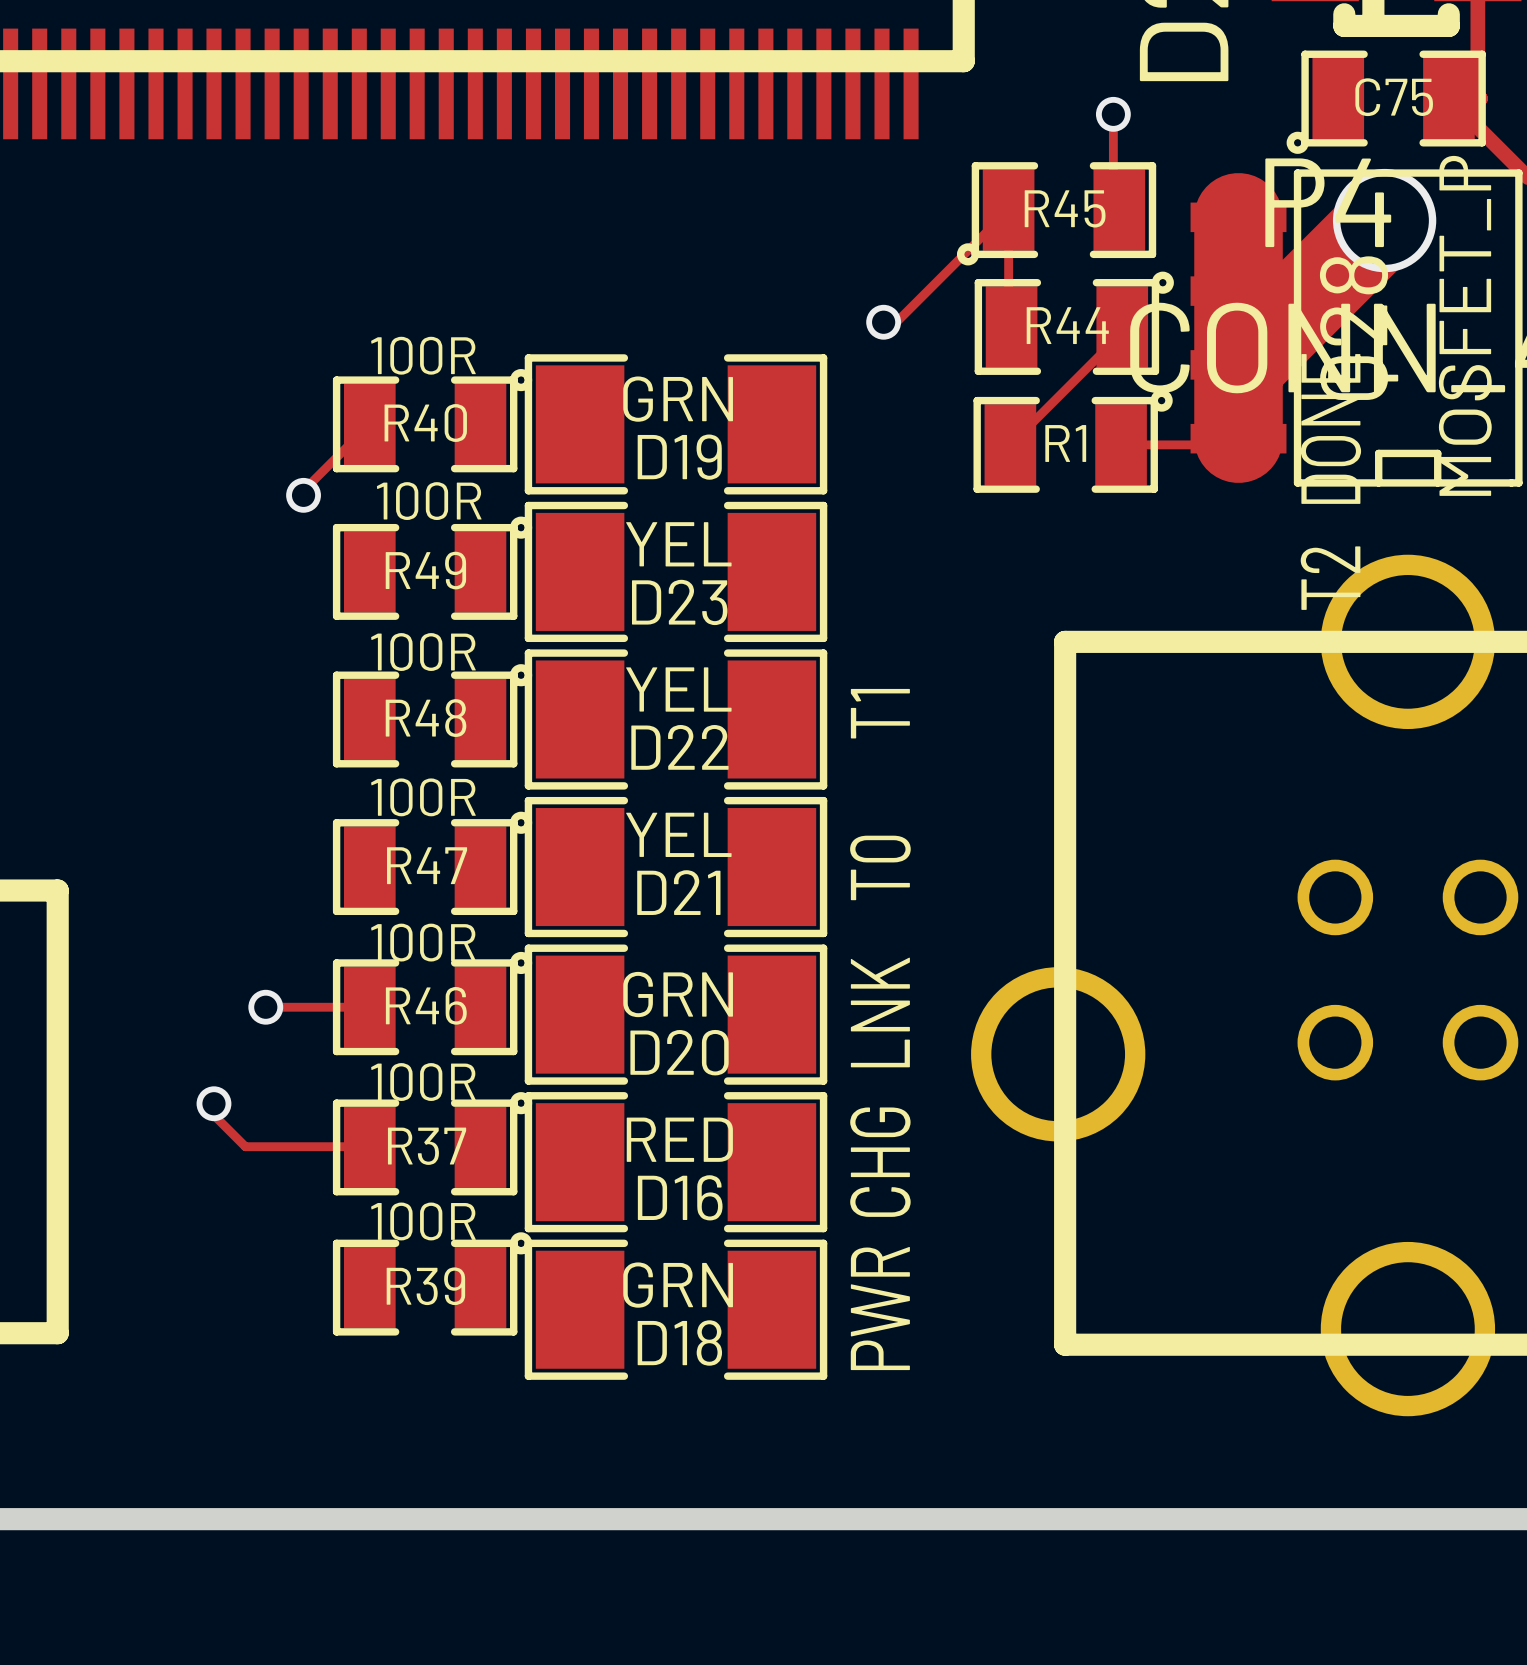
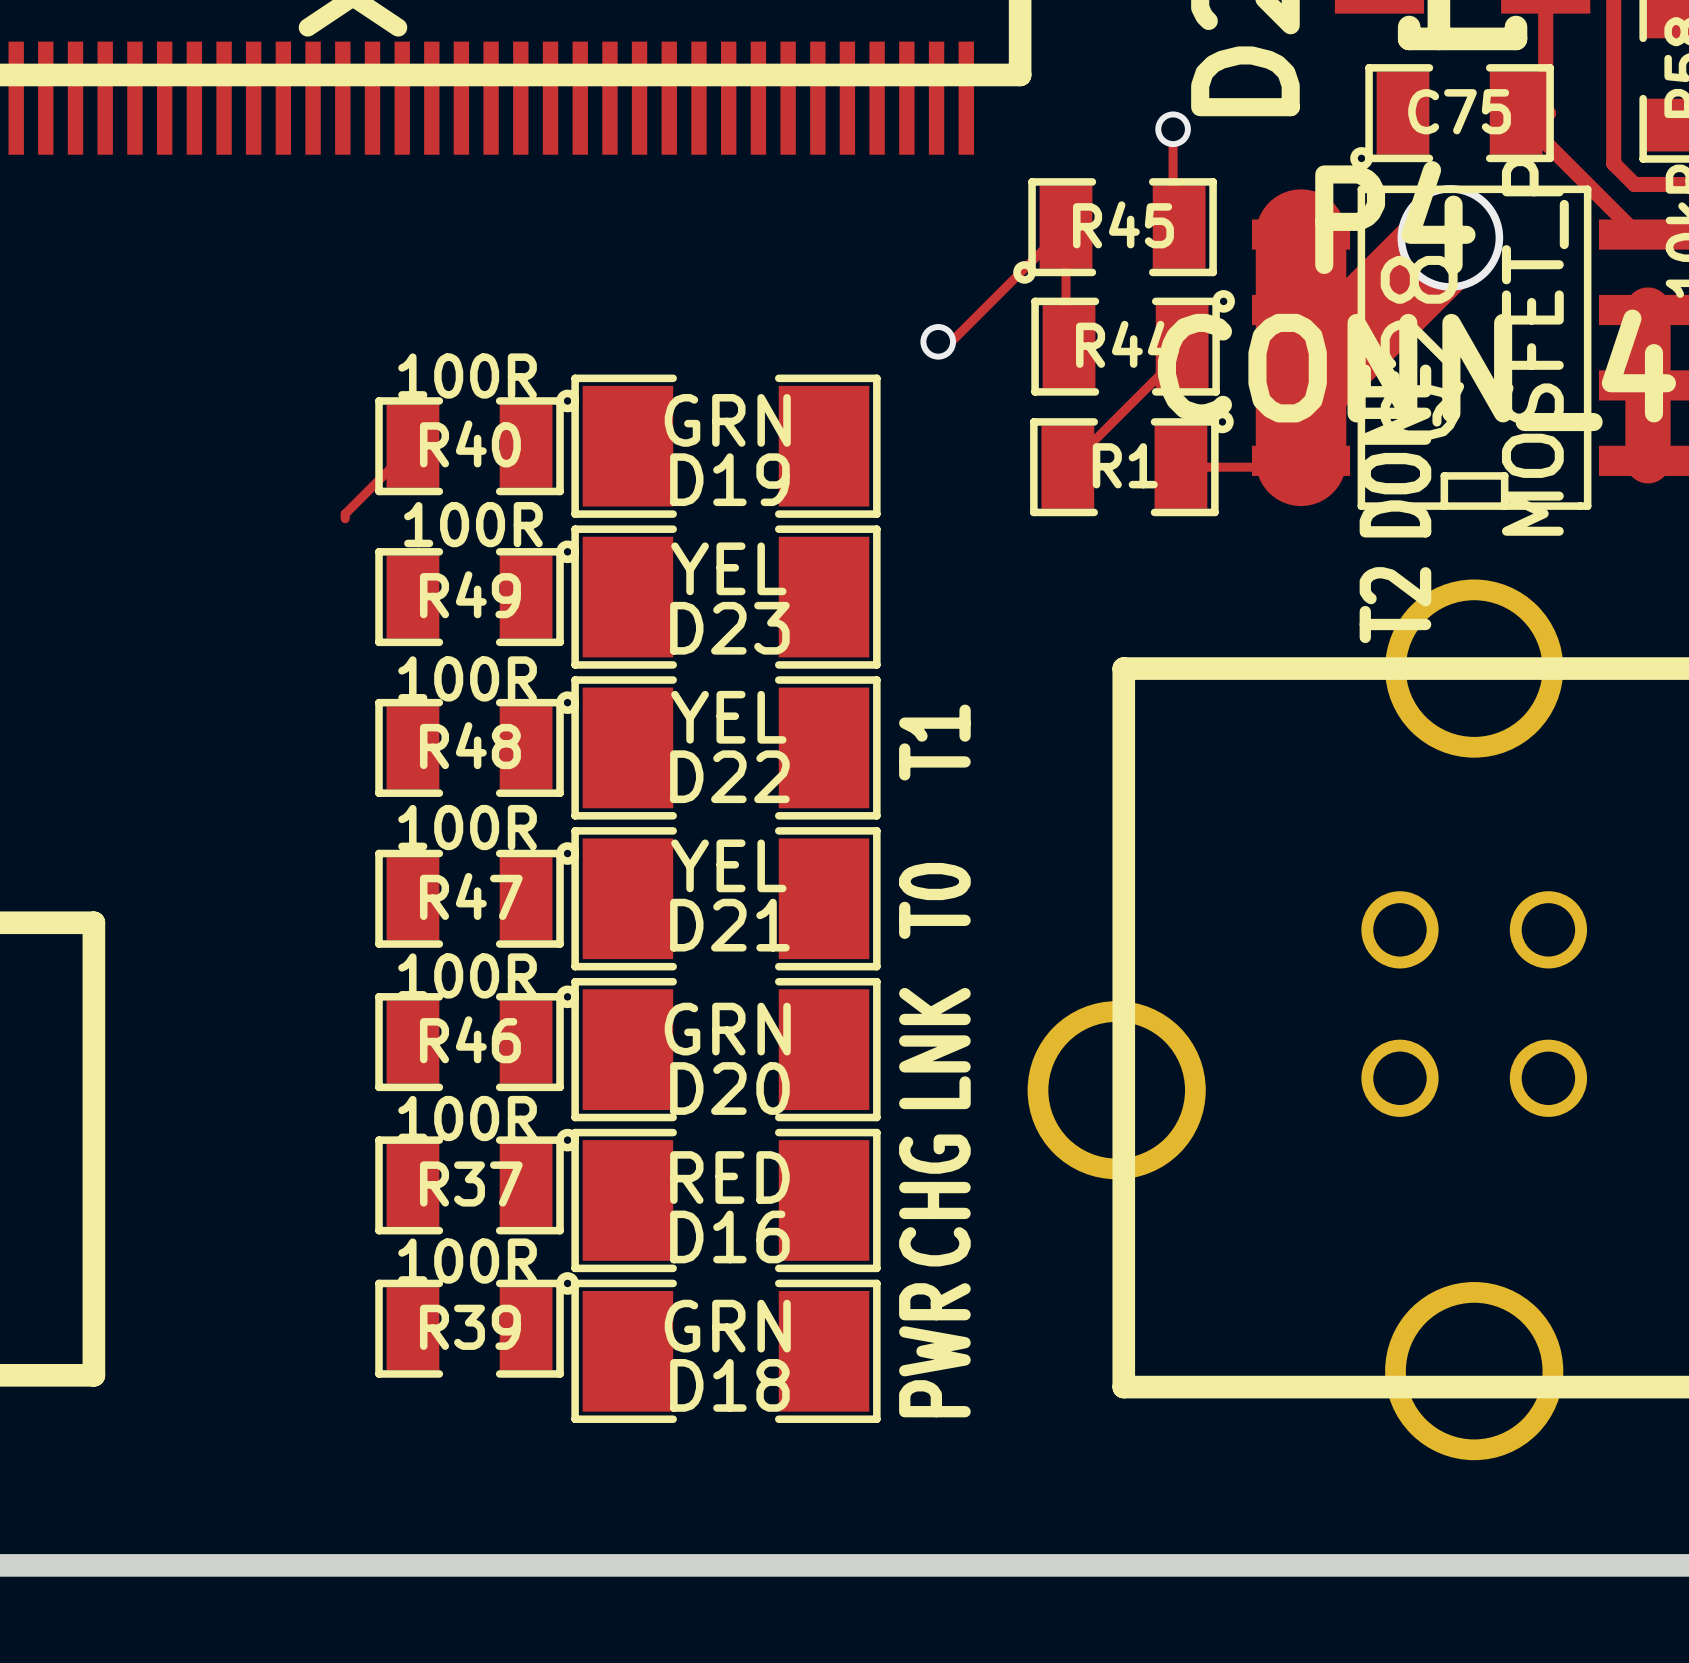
via: (303, 495) -> none
track: (265, 1007) (369, 1007) -> none
via: (265, 1007) -> none
track: (213, 1103) (213, 1115) (245, 1146) (369, 1146) -> none
via: (213, 1103) -> none

